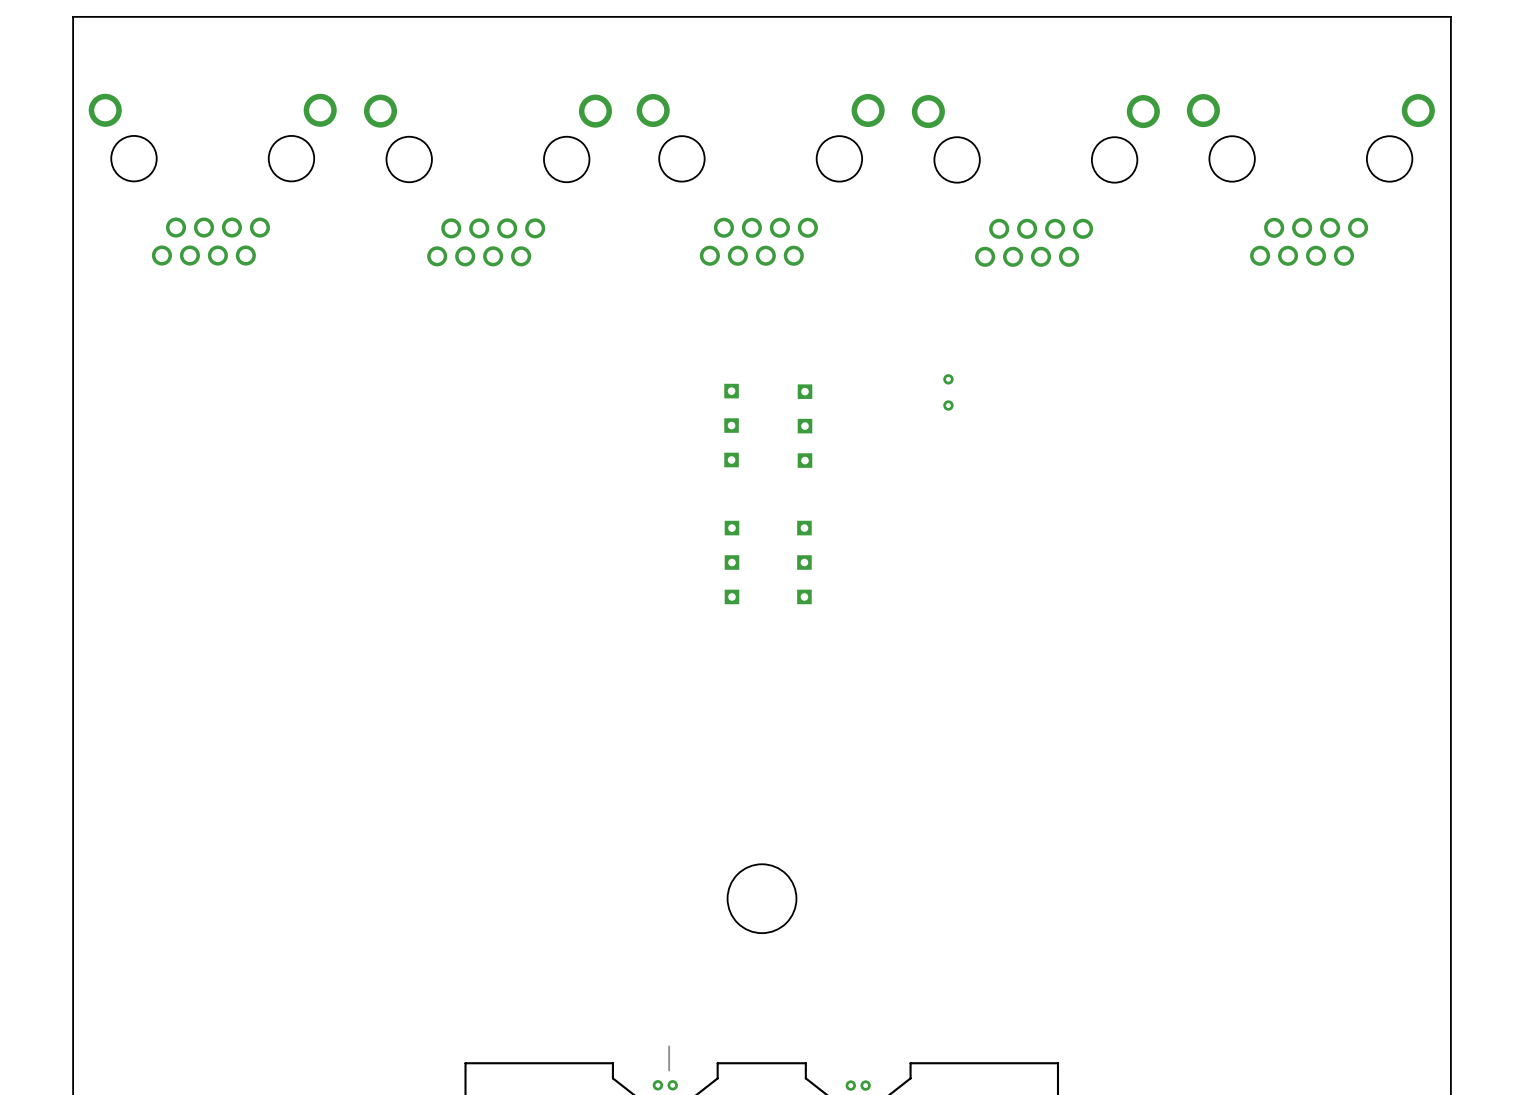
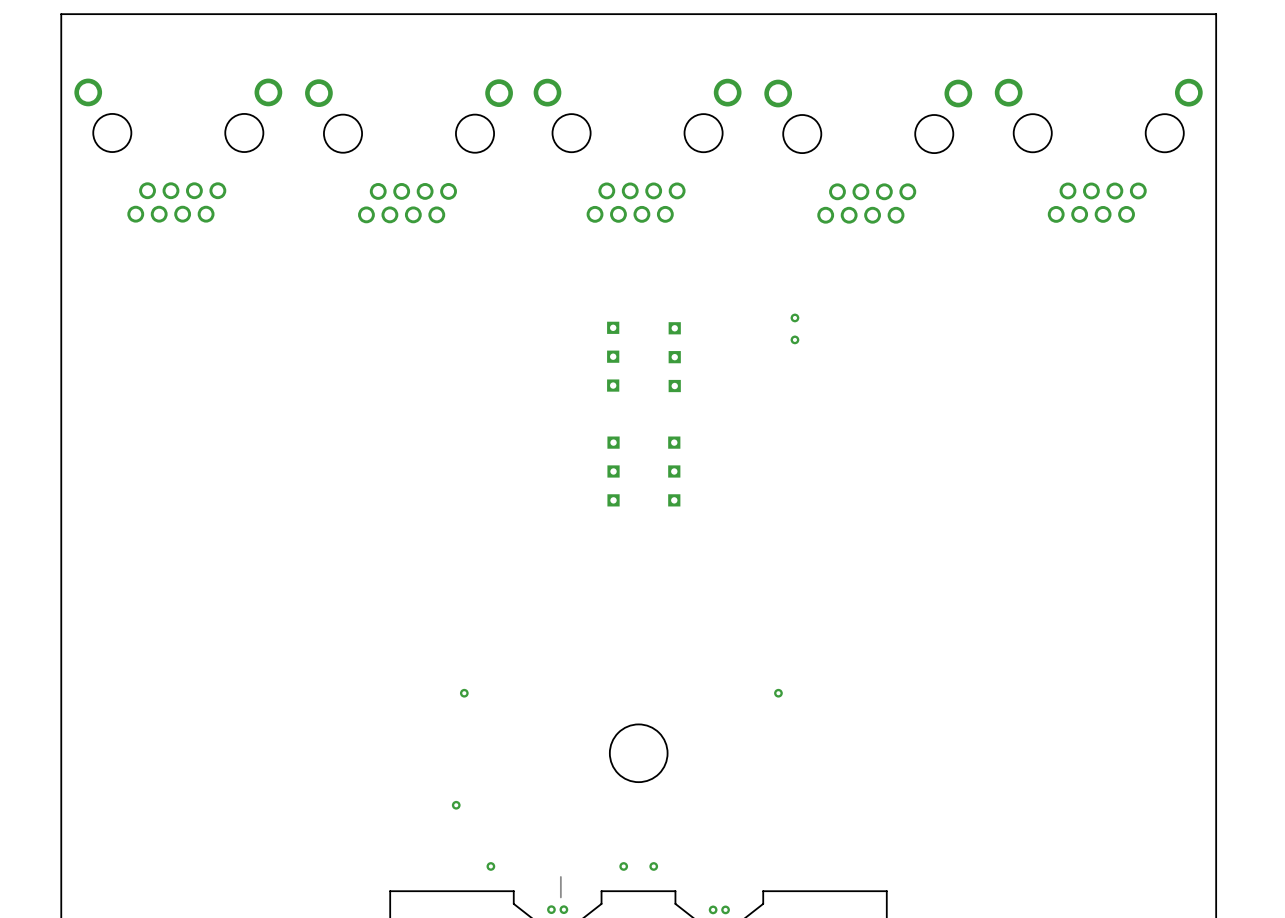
via: none -> (464, 693)
via: none -> (778, 693)
via: none -> (456, 805)
via: none -> (490, 866)
via: none -> (623, 866)
via: none -> (653, 866)

